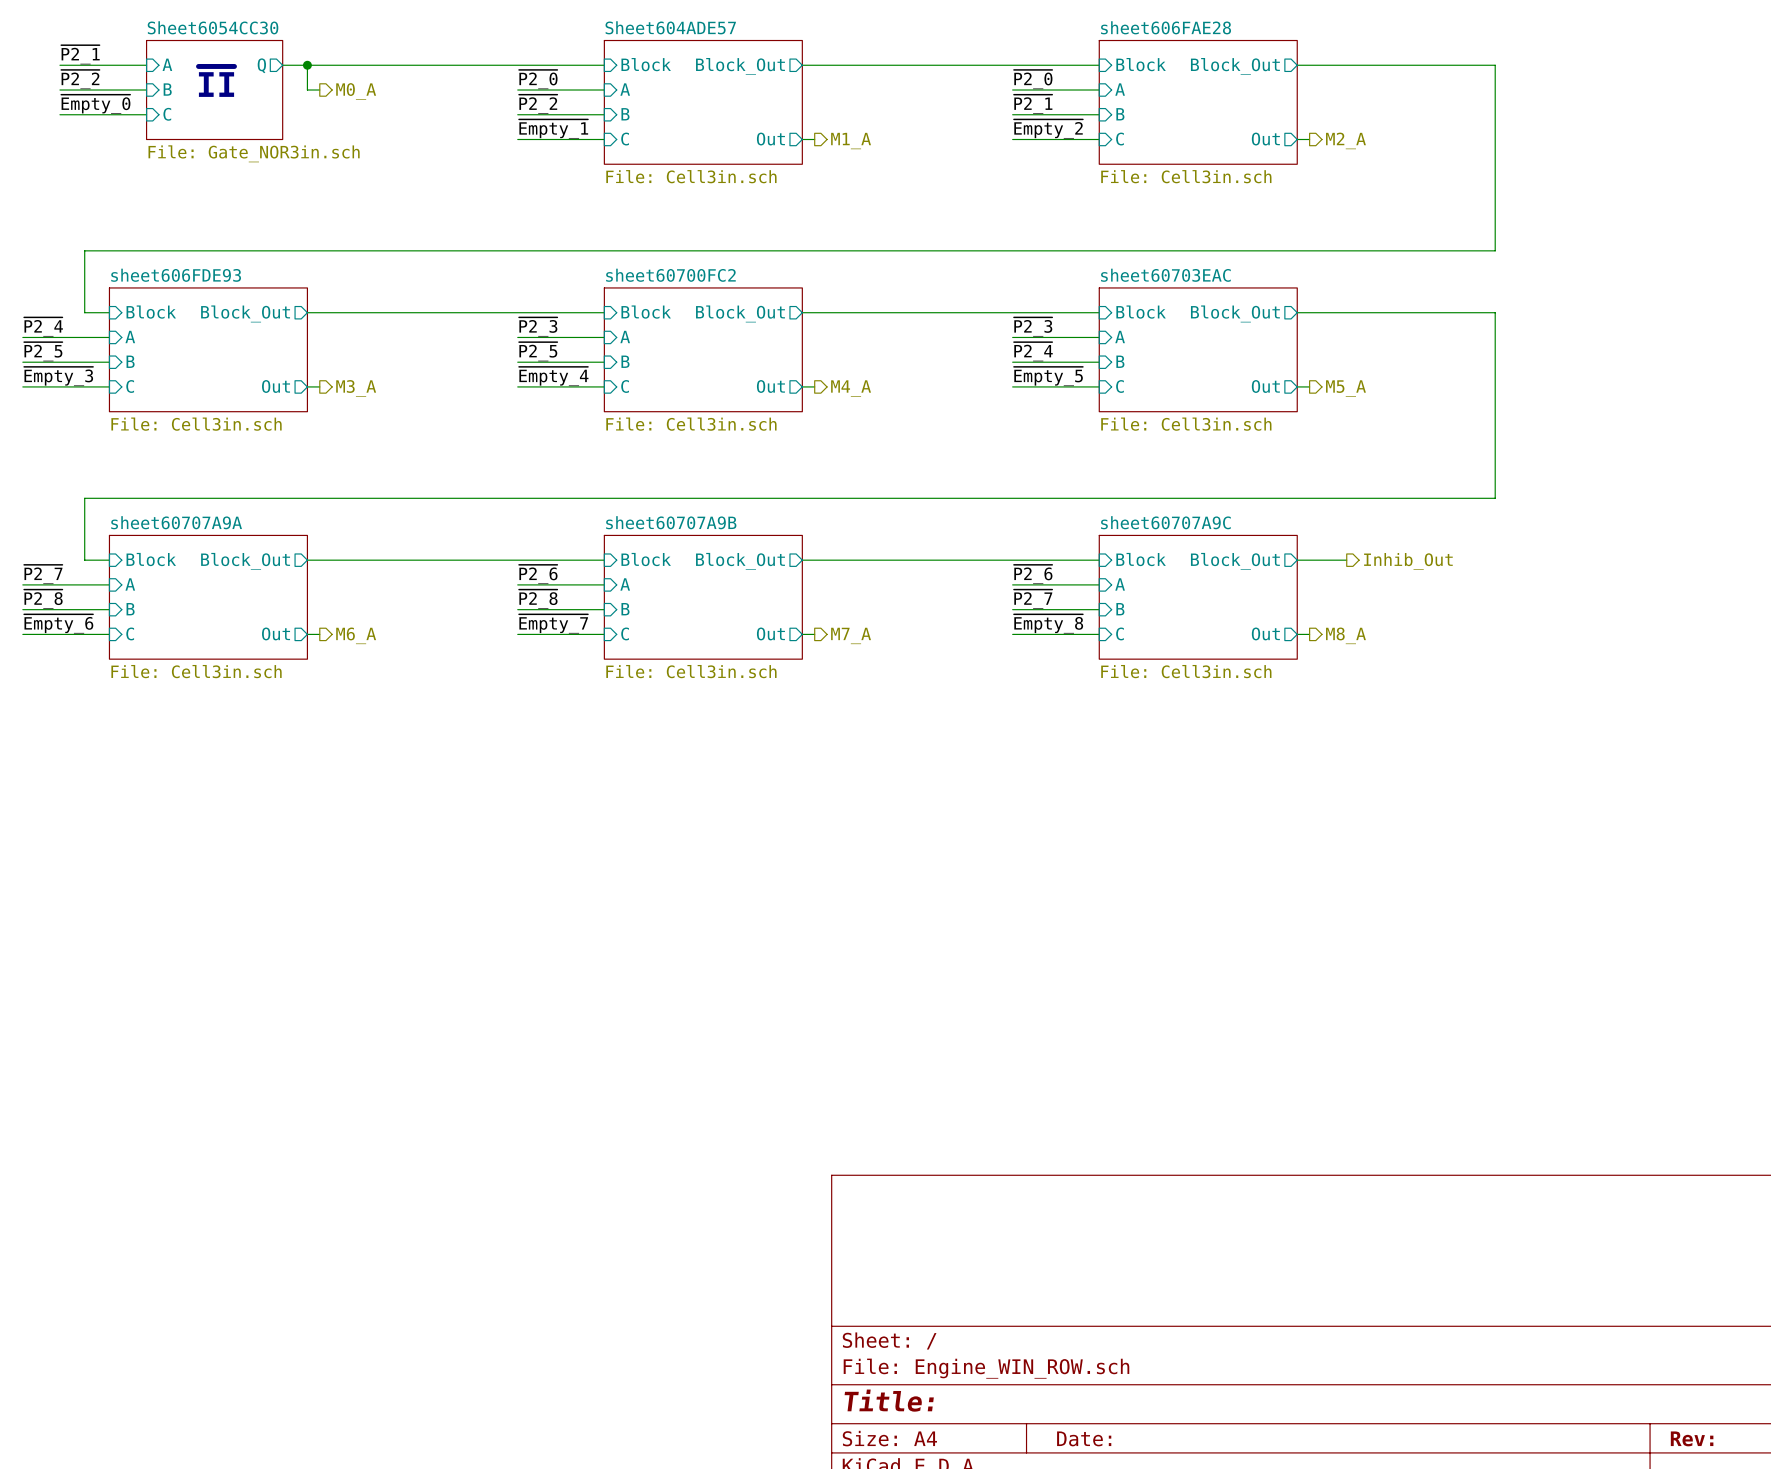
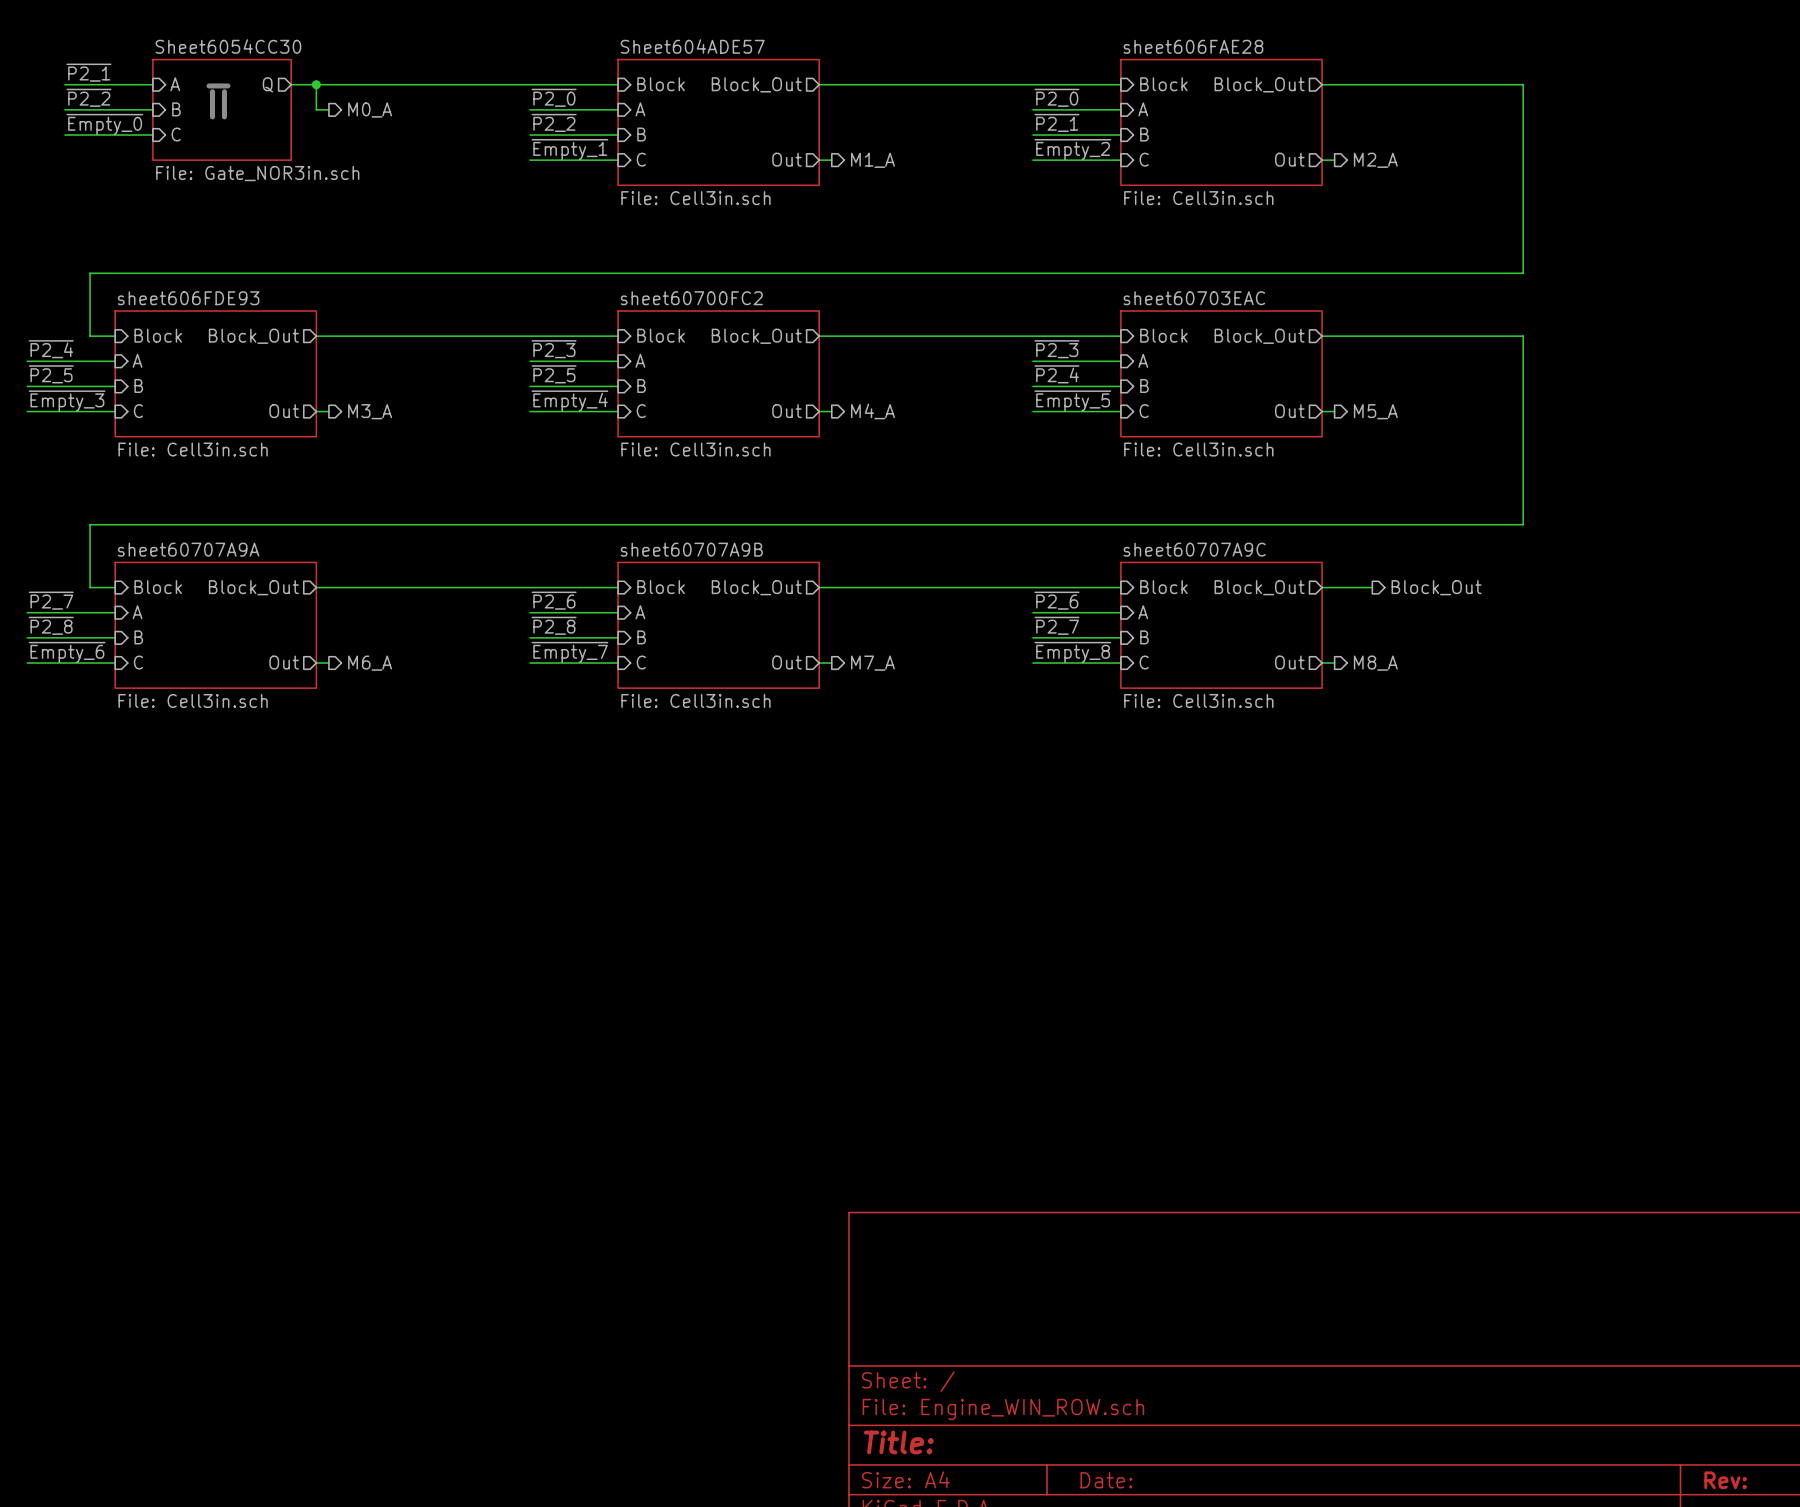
hierarchical label: Inhib_Out (1408, 561) -> Block_Out (1436, 587)

